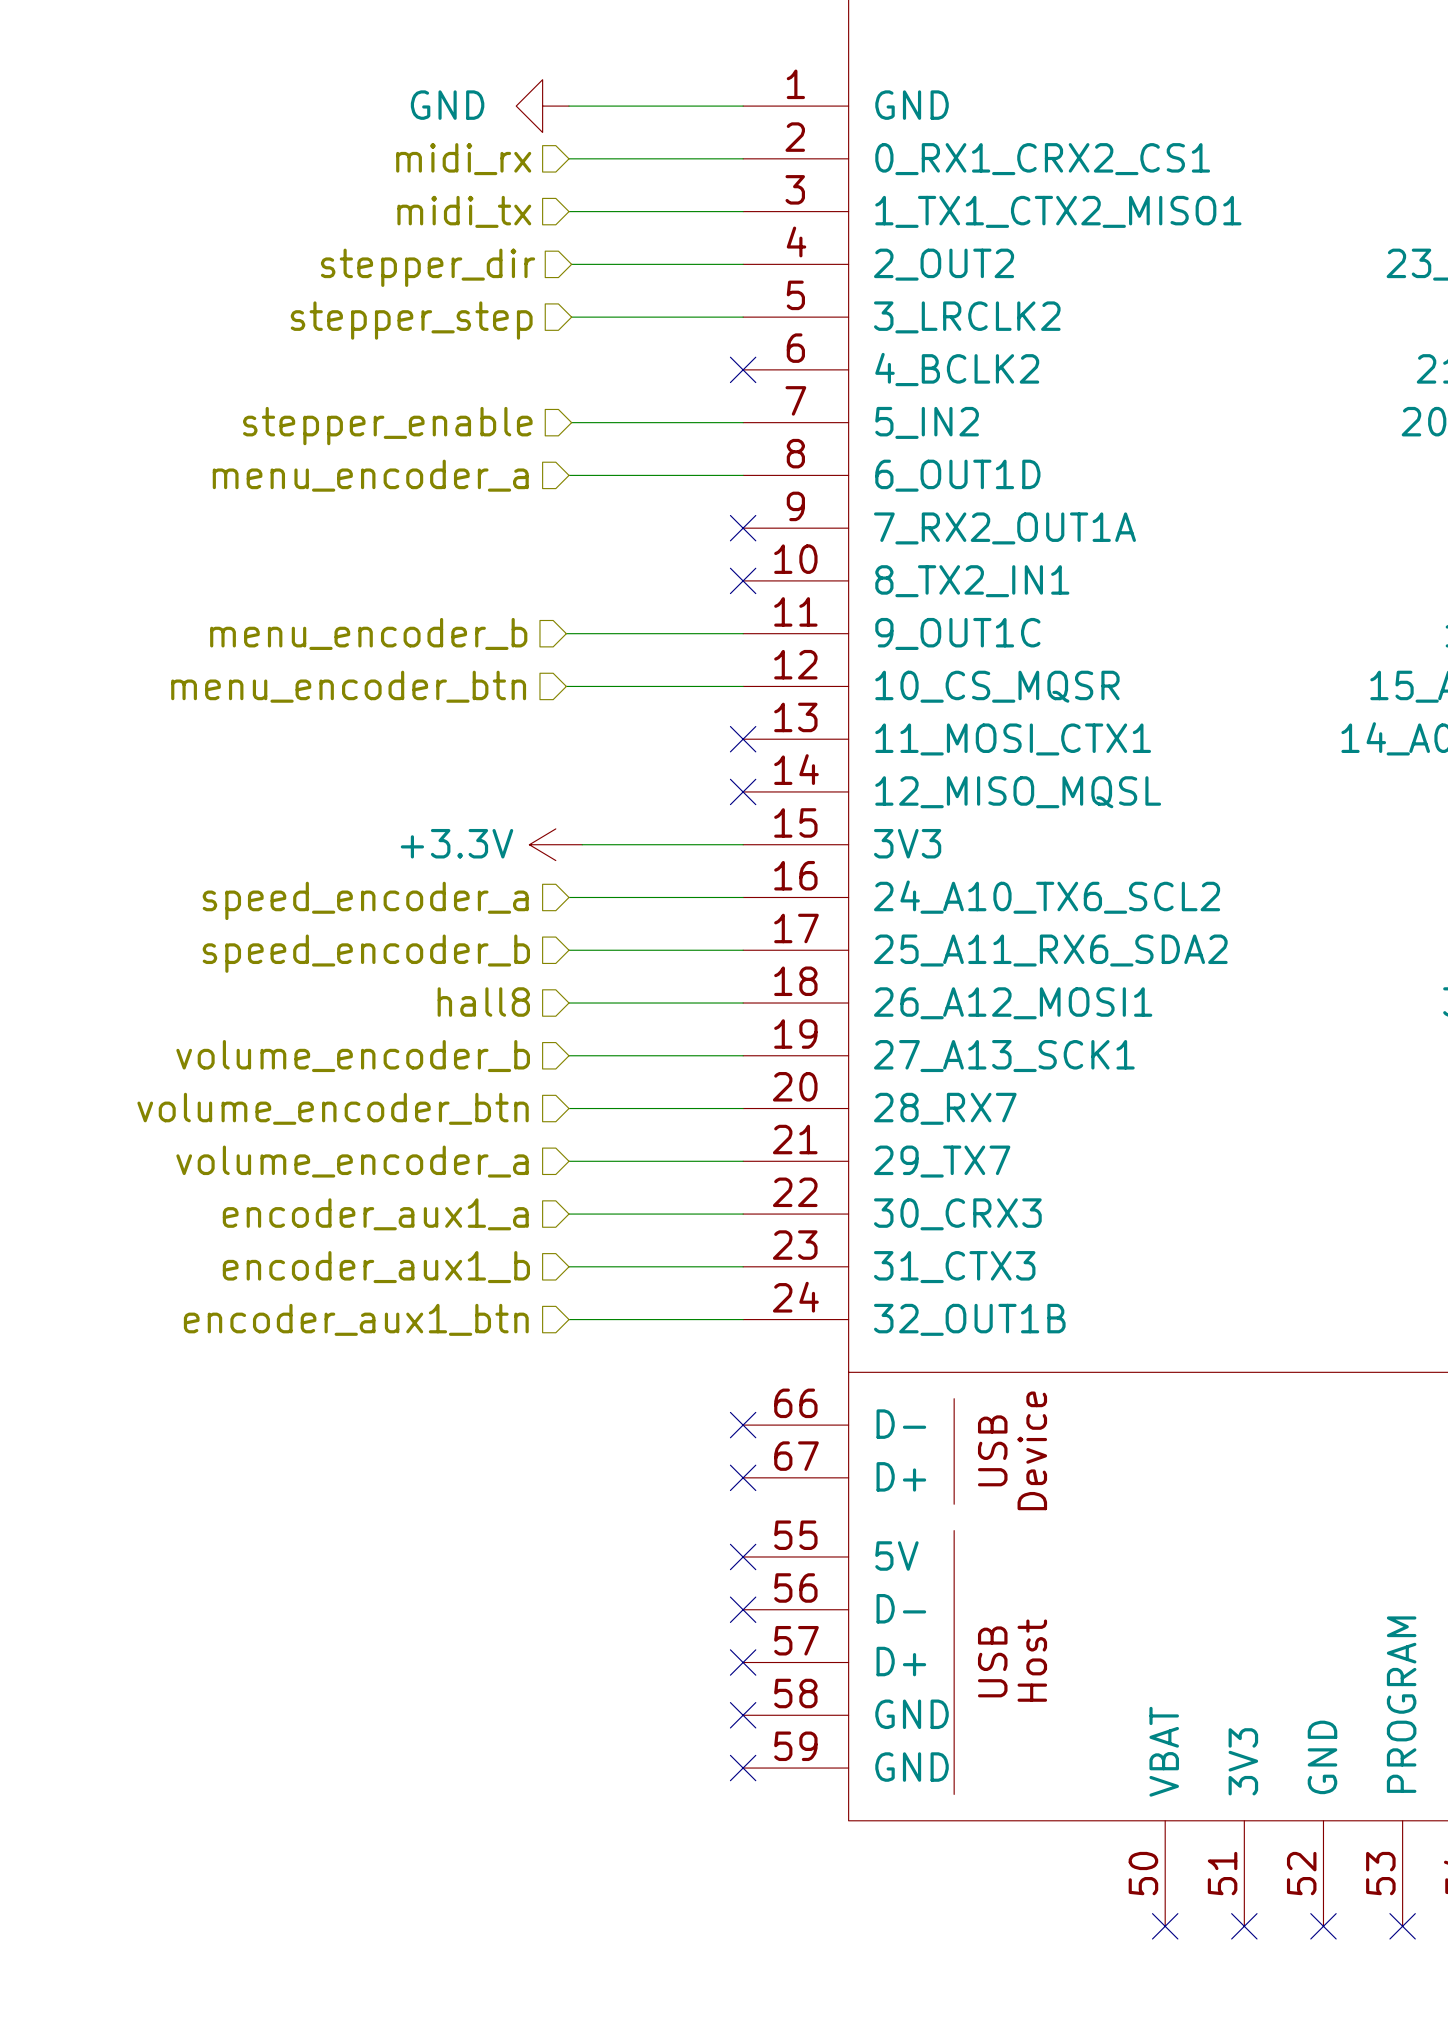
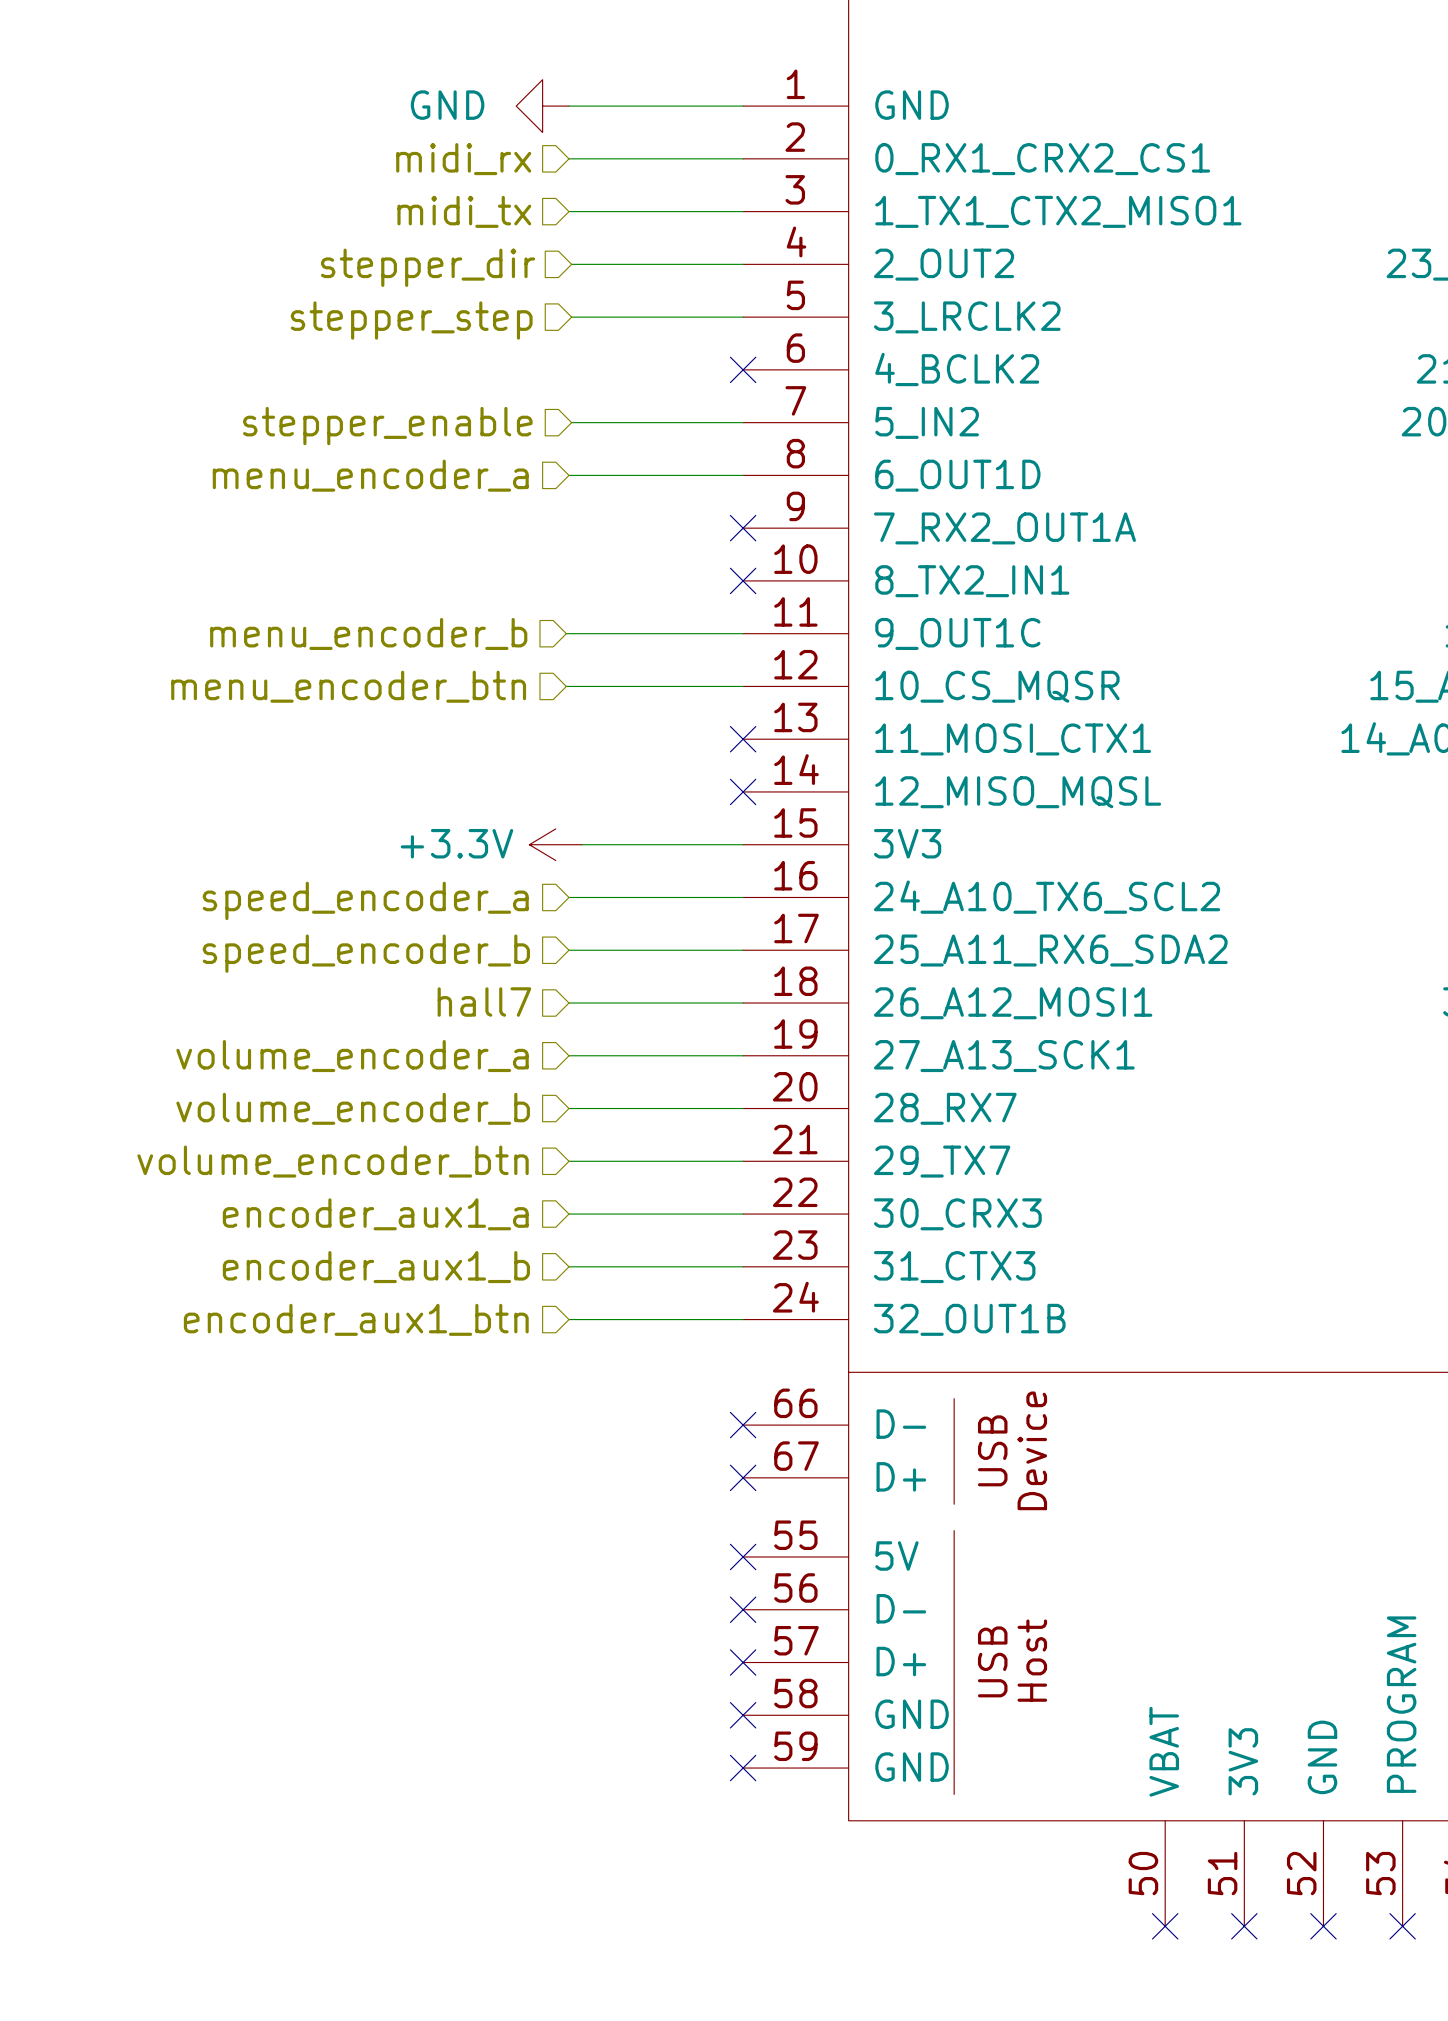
hierarchical label: hall8 (483, 1002) -> hall7 (484, 1002)
hierarchical label: volume_encoder_b (353, 1056) -> volume_encoder_a (352, 1056)
hierarchical label: volume_encoder_btn (333, 1108) -> volume_encoder_b (353, 1108)
hierarchical label: volume_encoder_a (352, 1161) -> volume_encoder_btn (333, 1161)

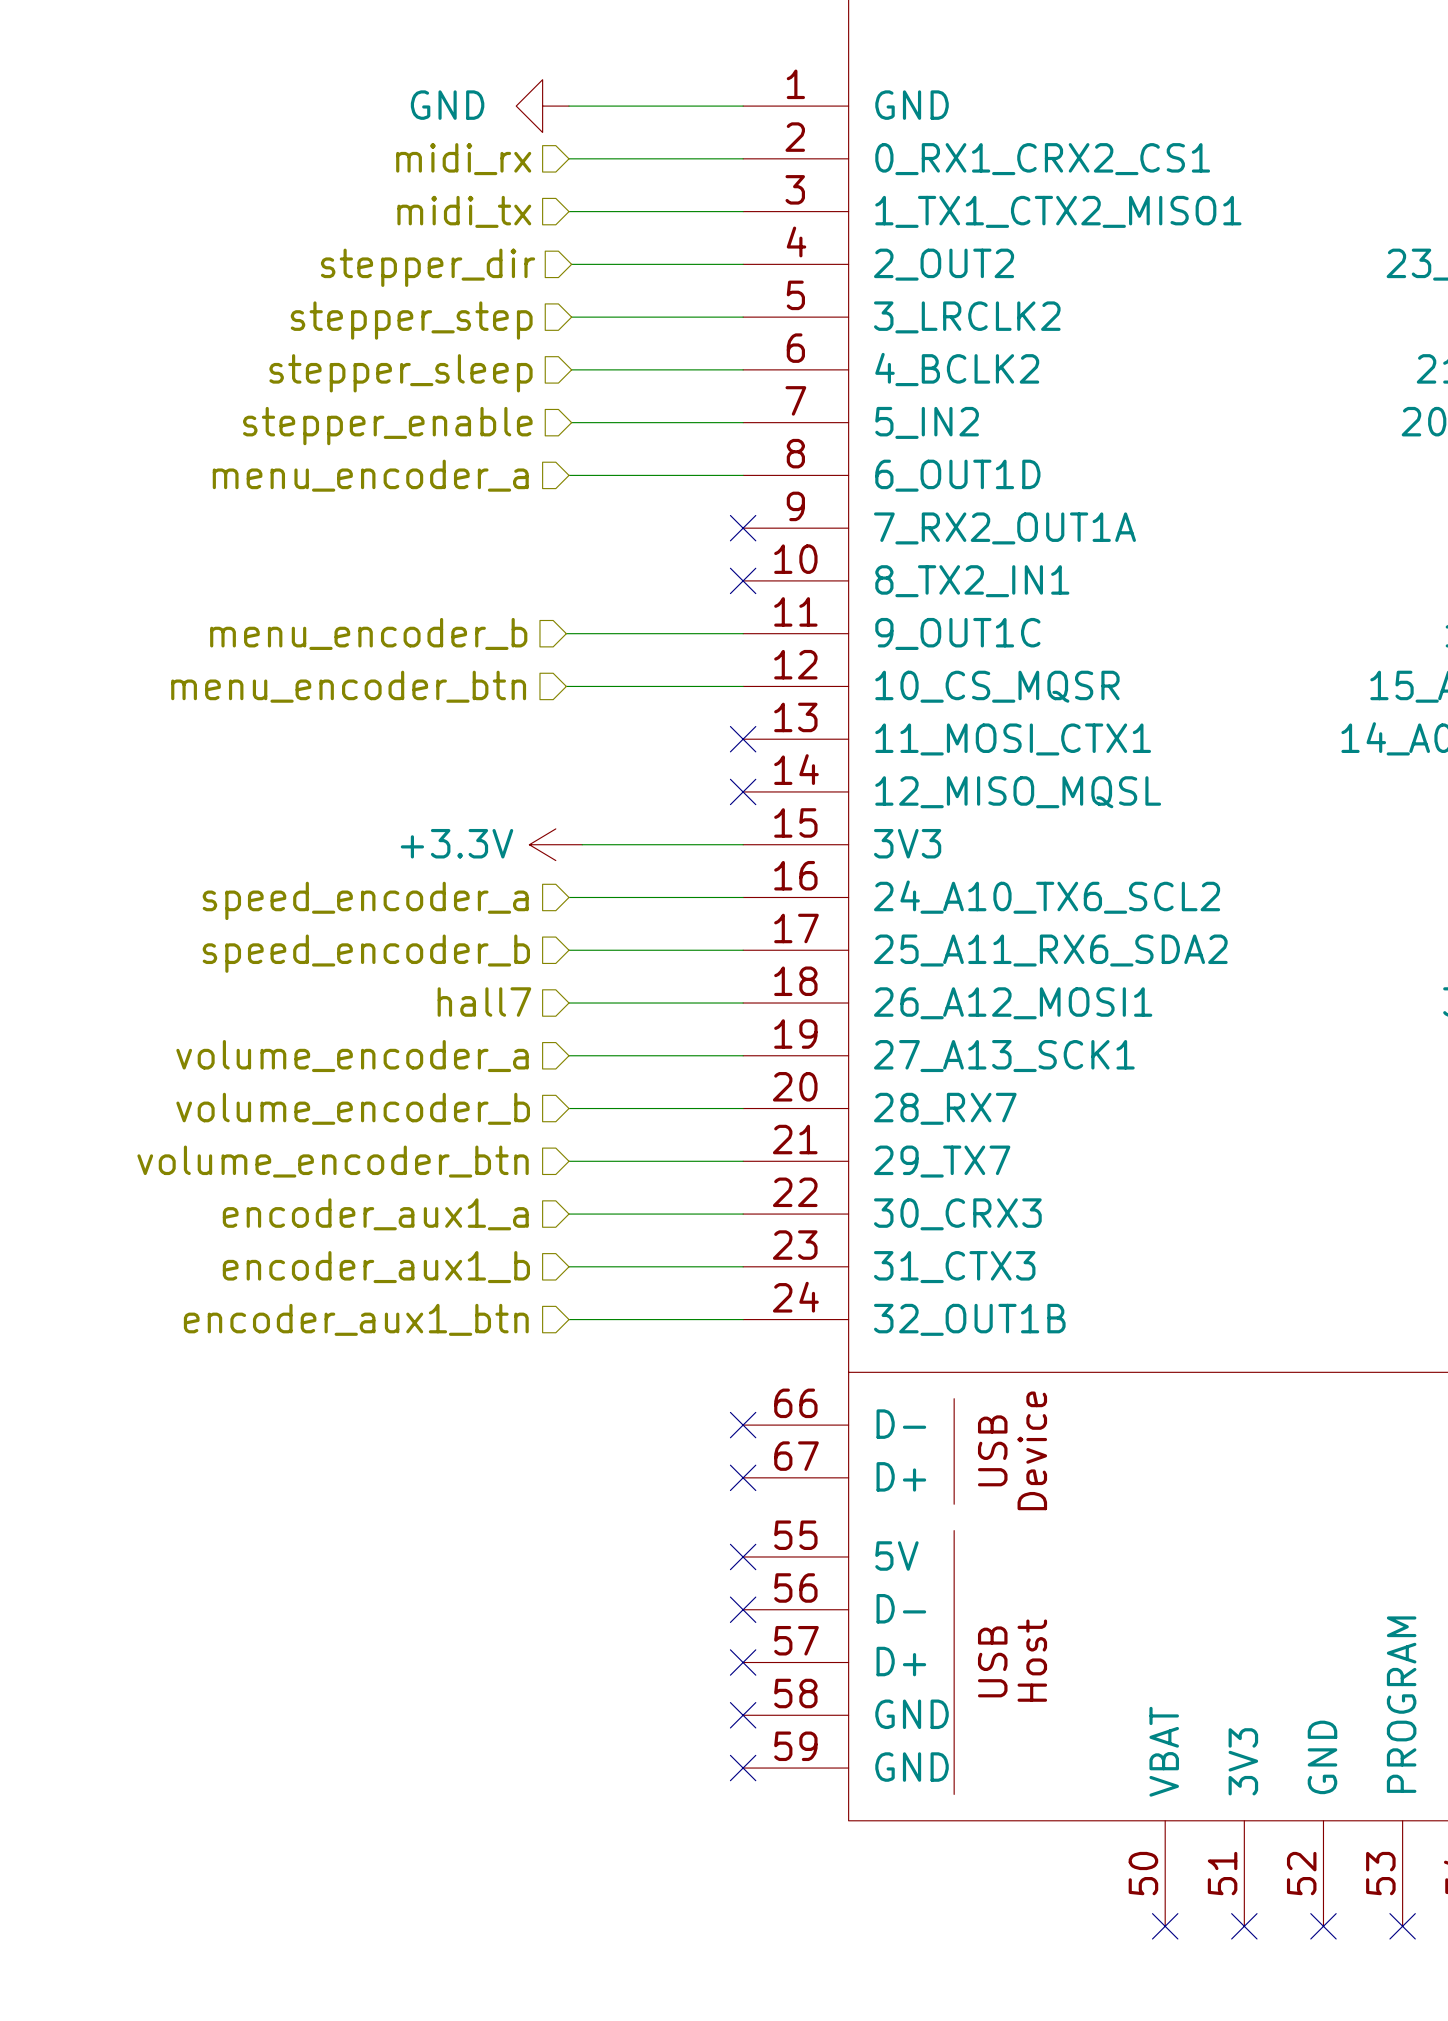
wire: none -> (571, 369) (743, 369)
no-connect mark: (743, 369) -> none
hierarchical label: none -> stepper_sleep (401, 373)

